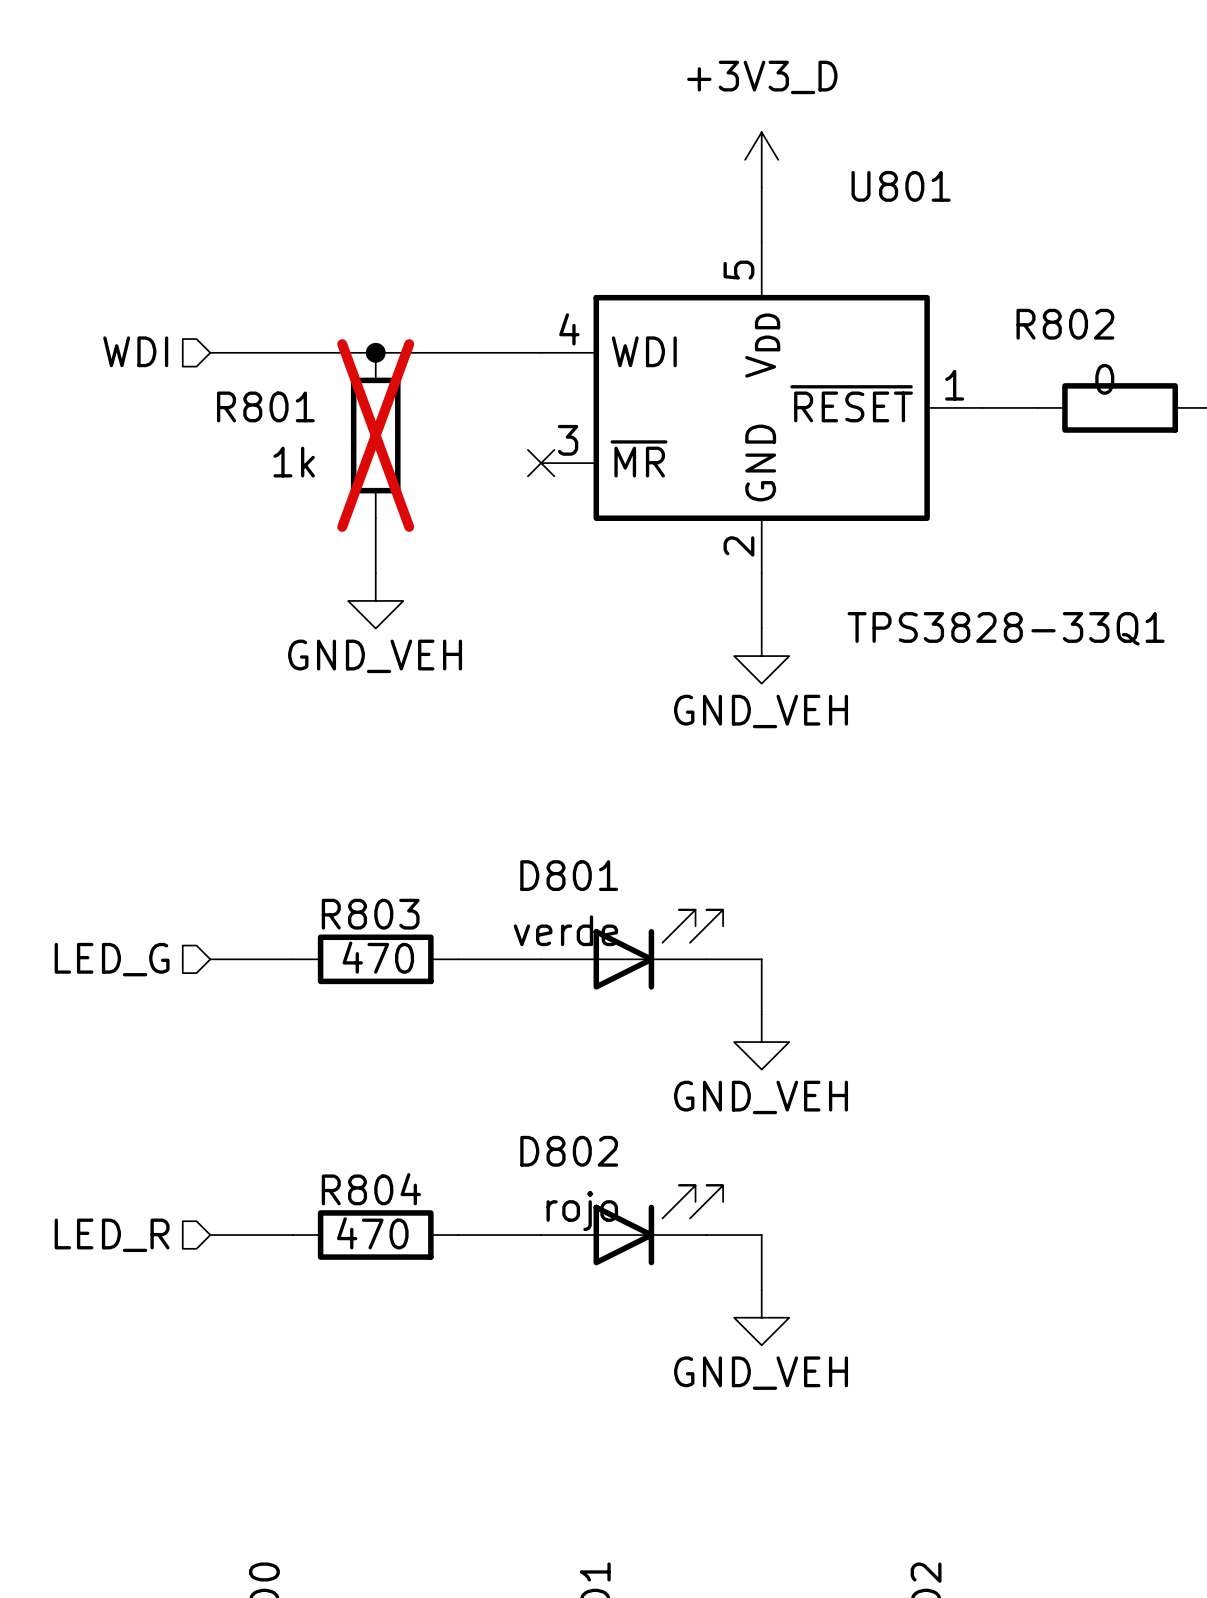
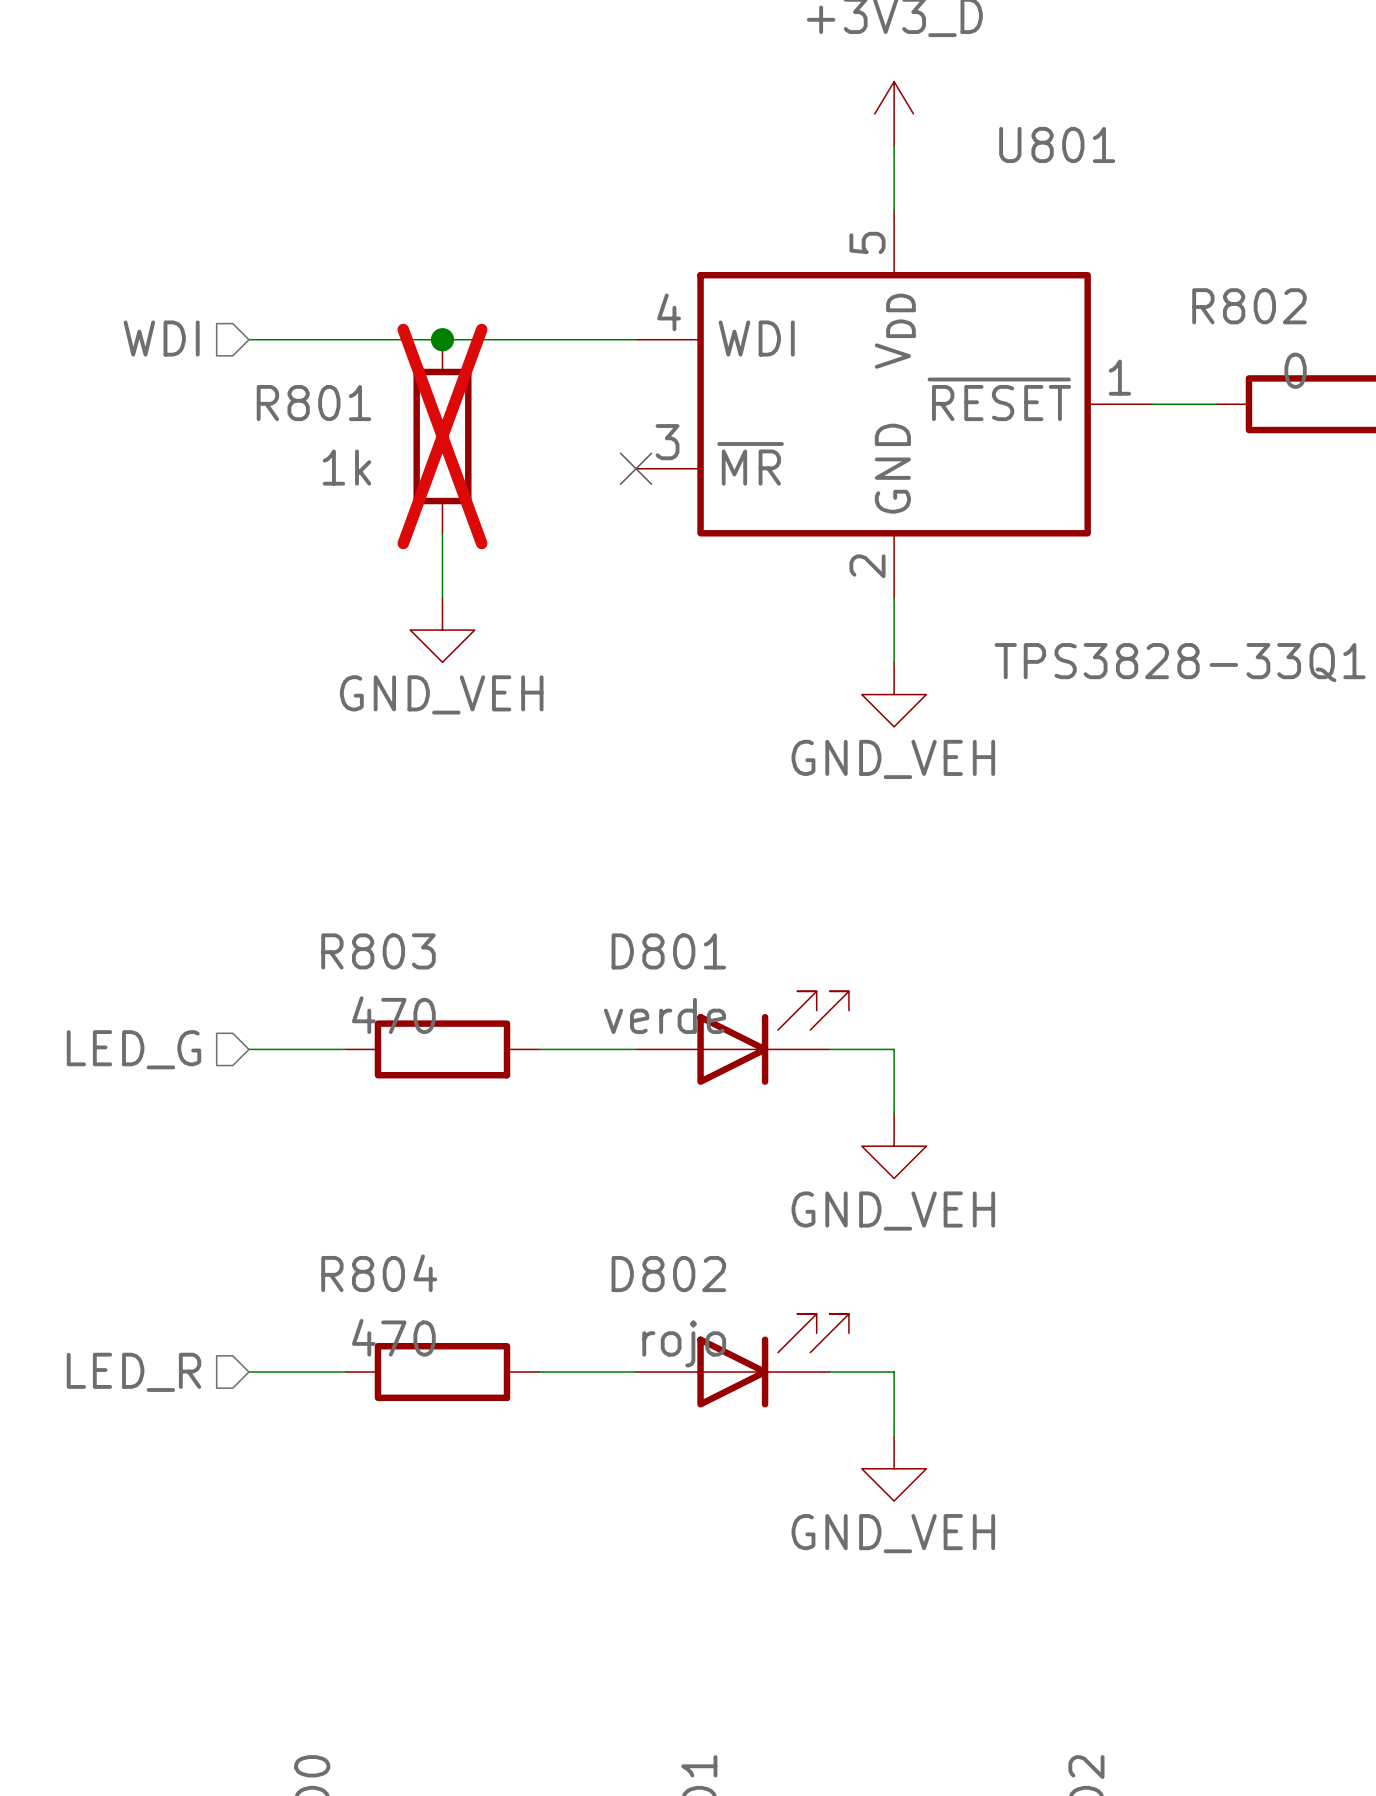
R803 name position: R803 (370, 914) -> R803 (378, 951)
R803 value position: 470 (378, 957) -> 470 (393, 1015)
R804 name position: R804 (371, 1189) -> R804 (379, 1273)
R804 value position: 470 (372, 1233) -> 470 (393, 1337)

